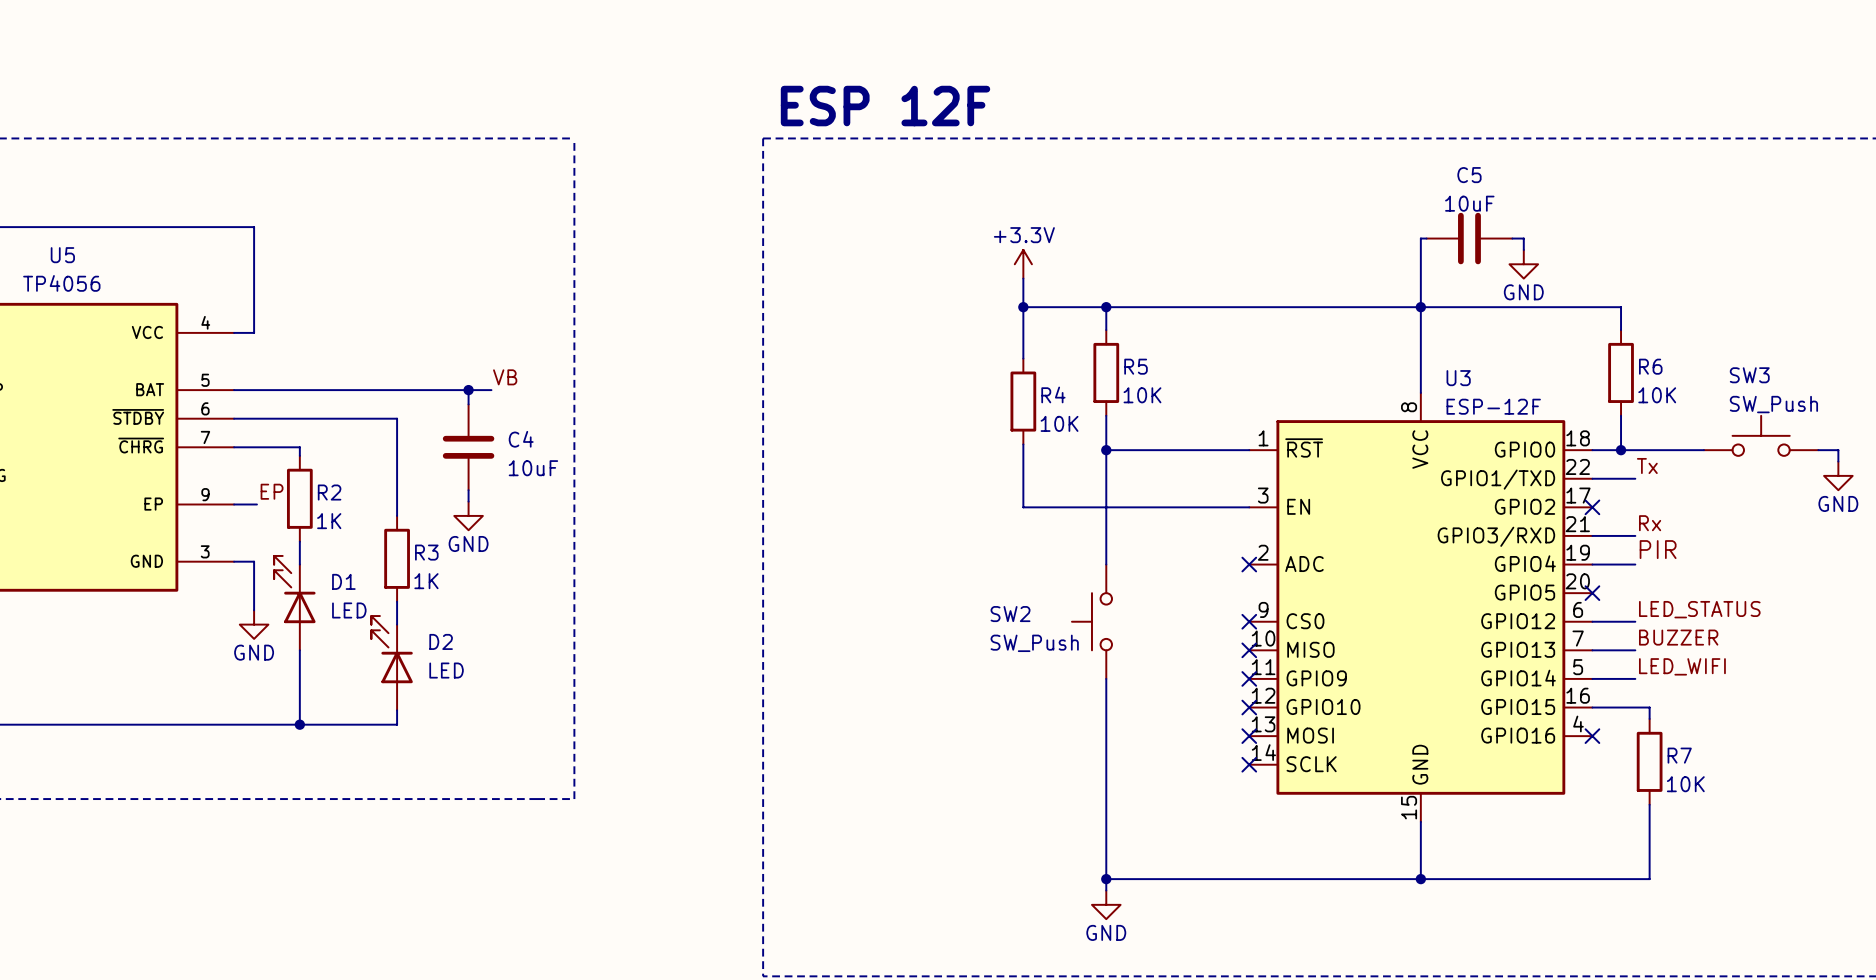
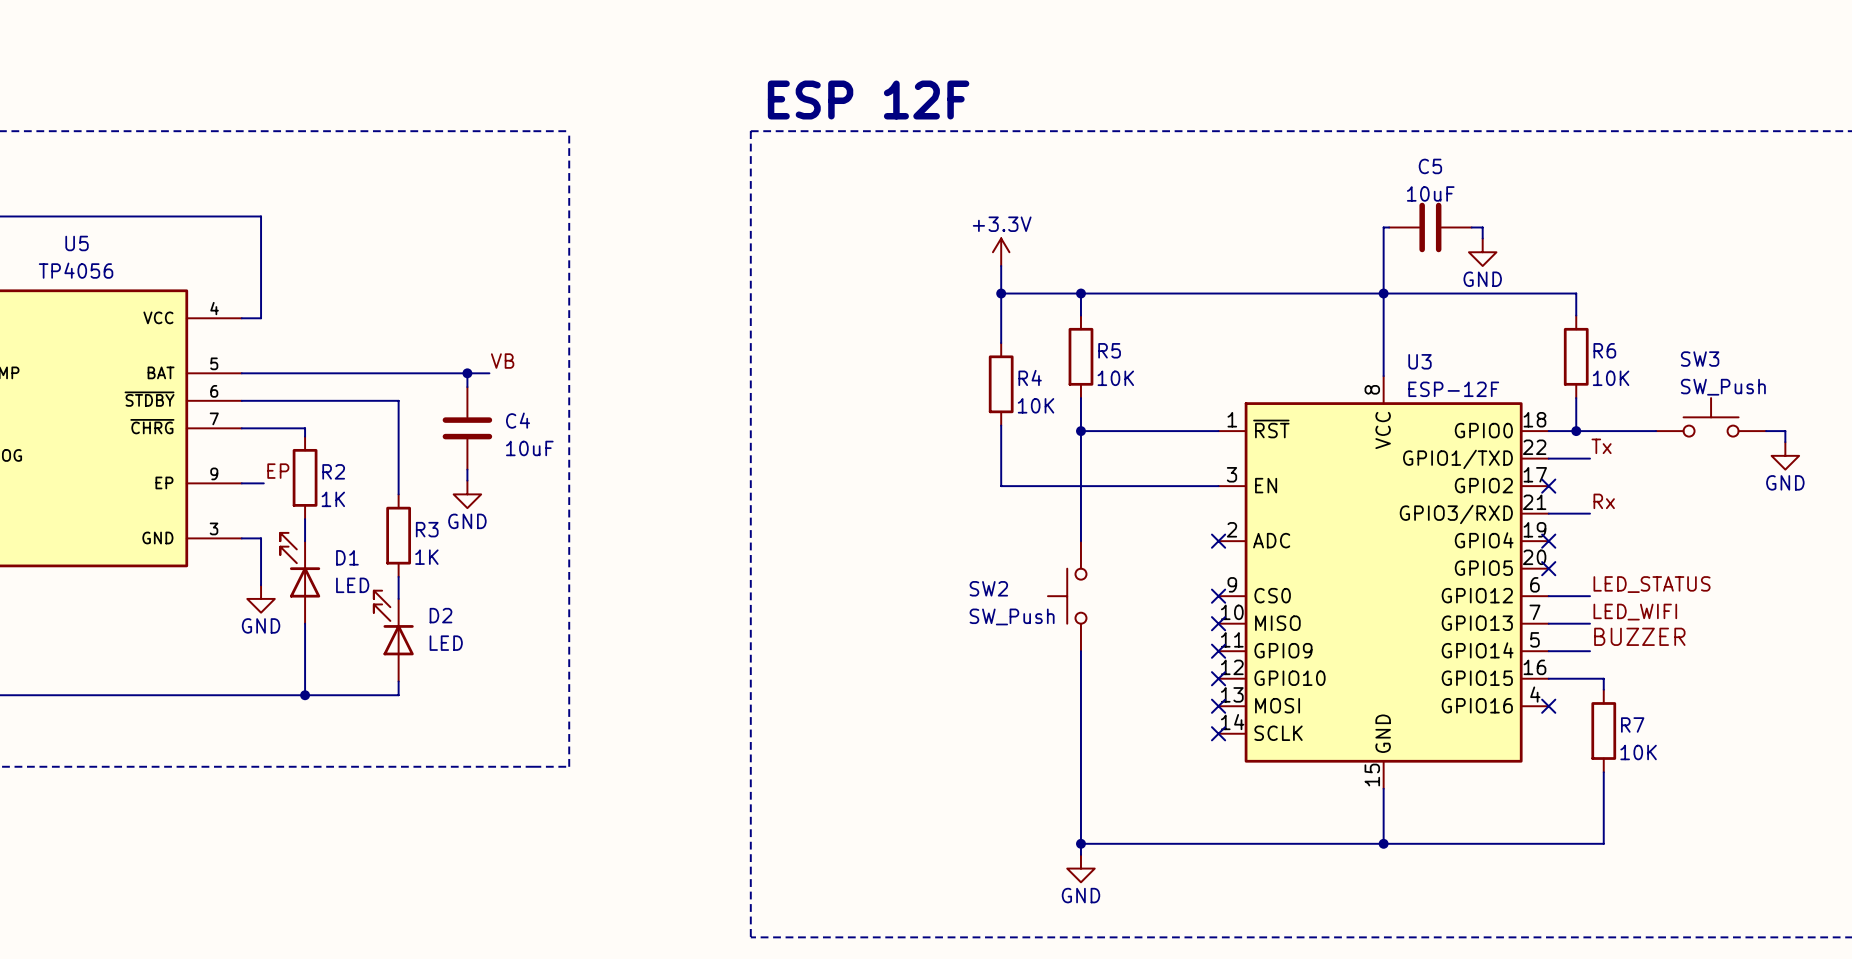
label: PIR (1658, 549) -> none
wire: (1592, 564) (1635, 564) -> none
no-connect mark: none -> (1548, 541)
label: BUZZER (1678, 637) -> LED_WIFI (1635, 612)
label: LED_WIFI (1682, 666) -> BUZZER (1639, 636)

